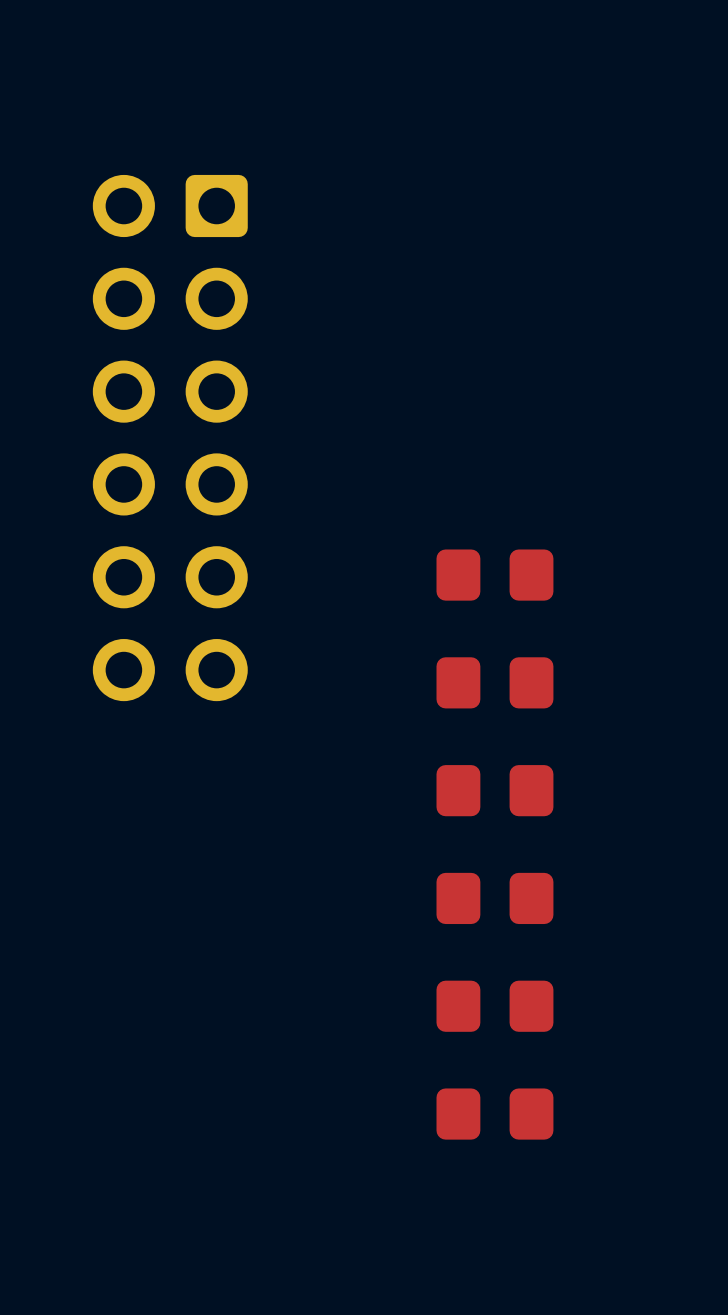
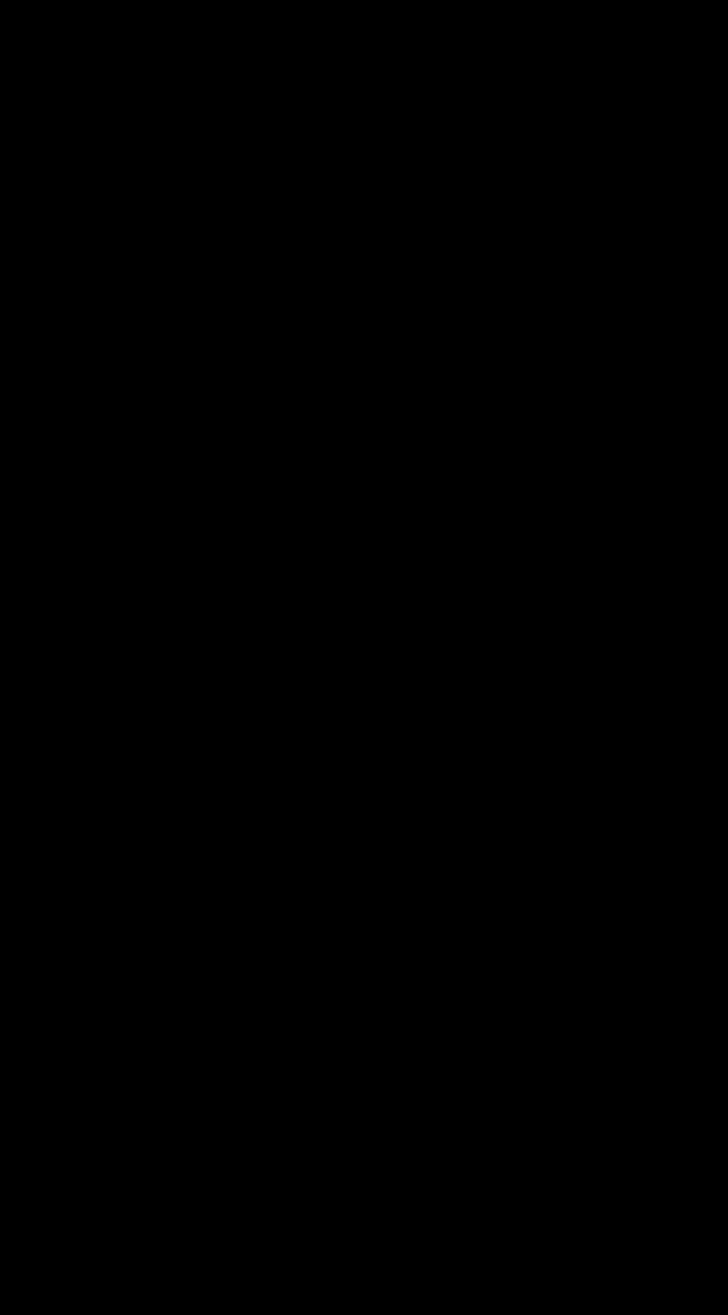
part: (170, 438) -> none
part: (494, 575) -> none
part: (494, 682) -> none
part: (494, 790) -> none
part: (494, 898) -> none
part: (494, 1006) -> none
part: (494, 1114) -> none

